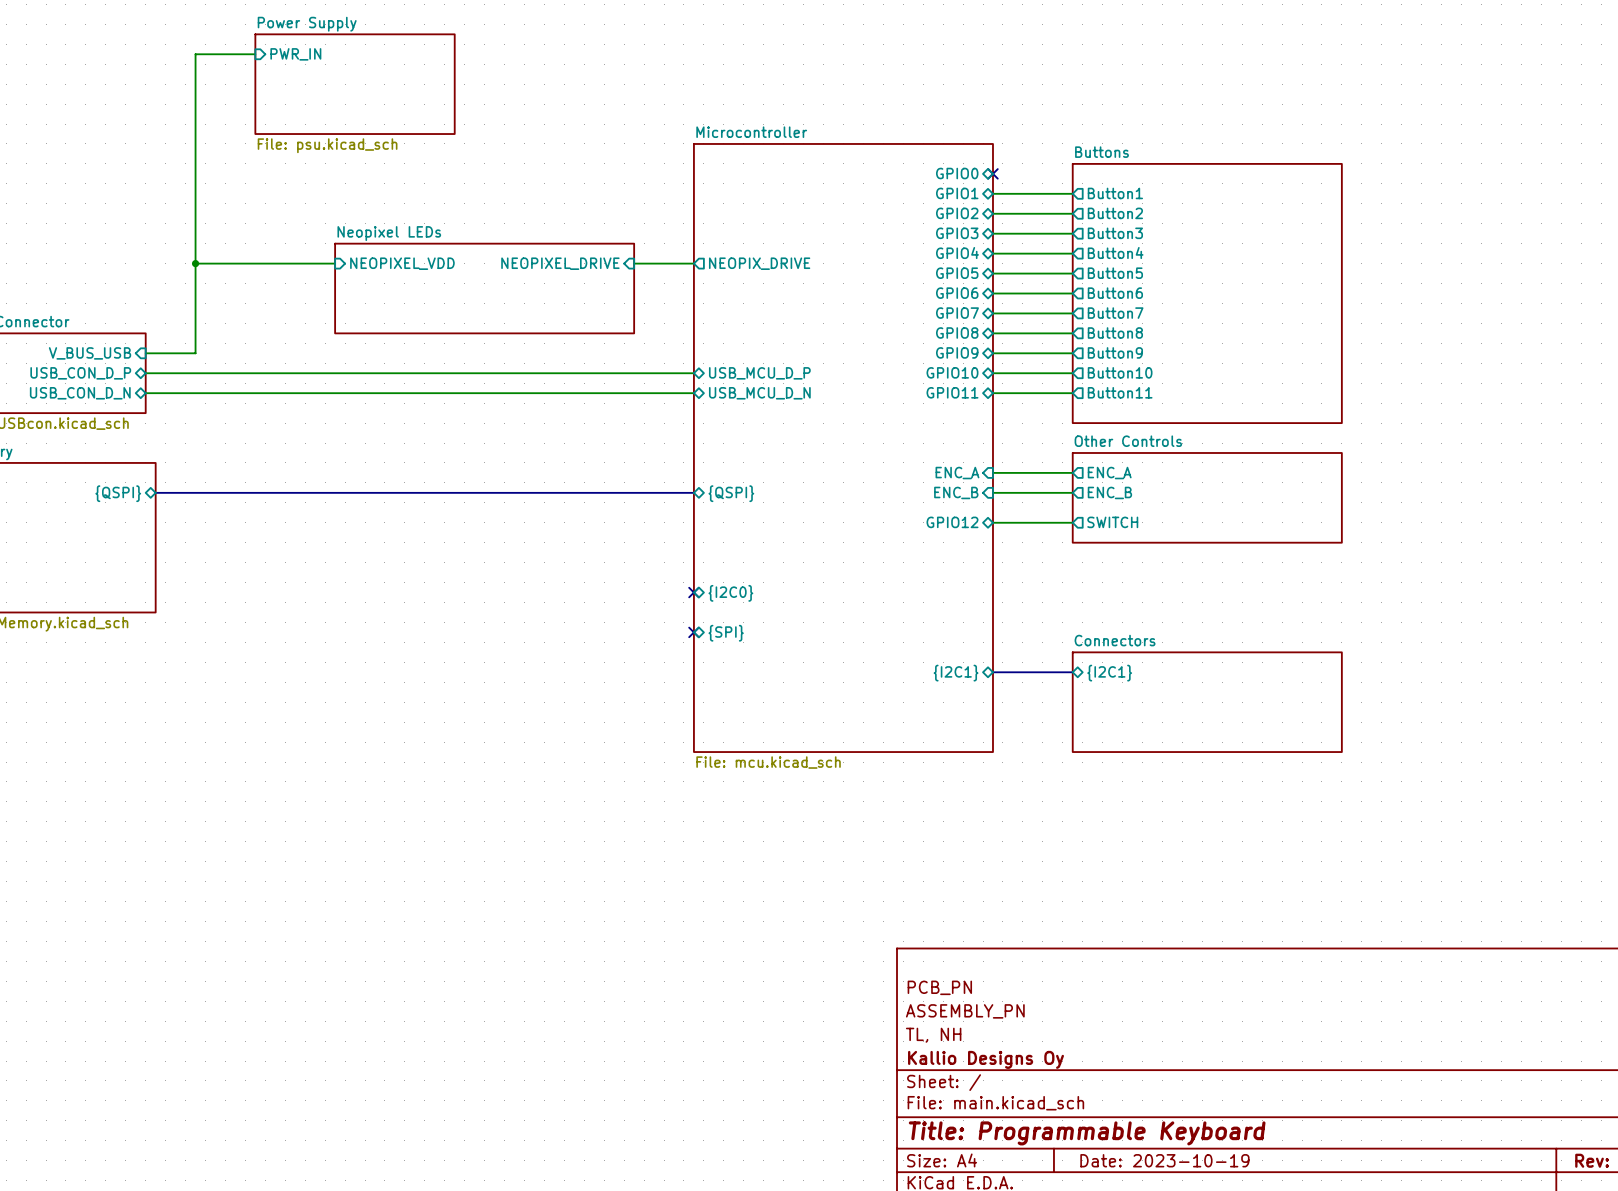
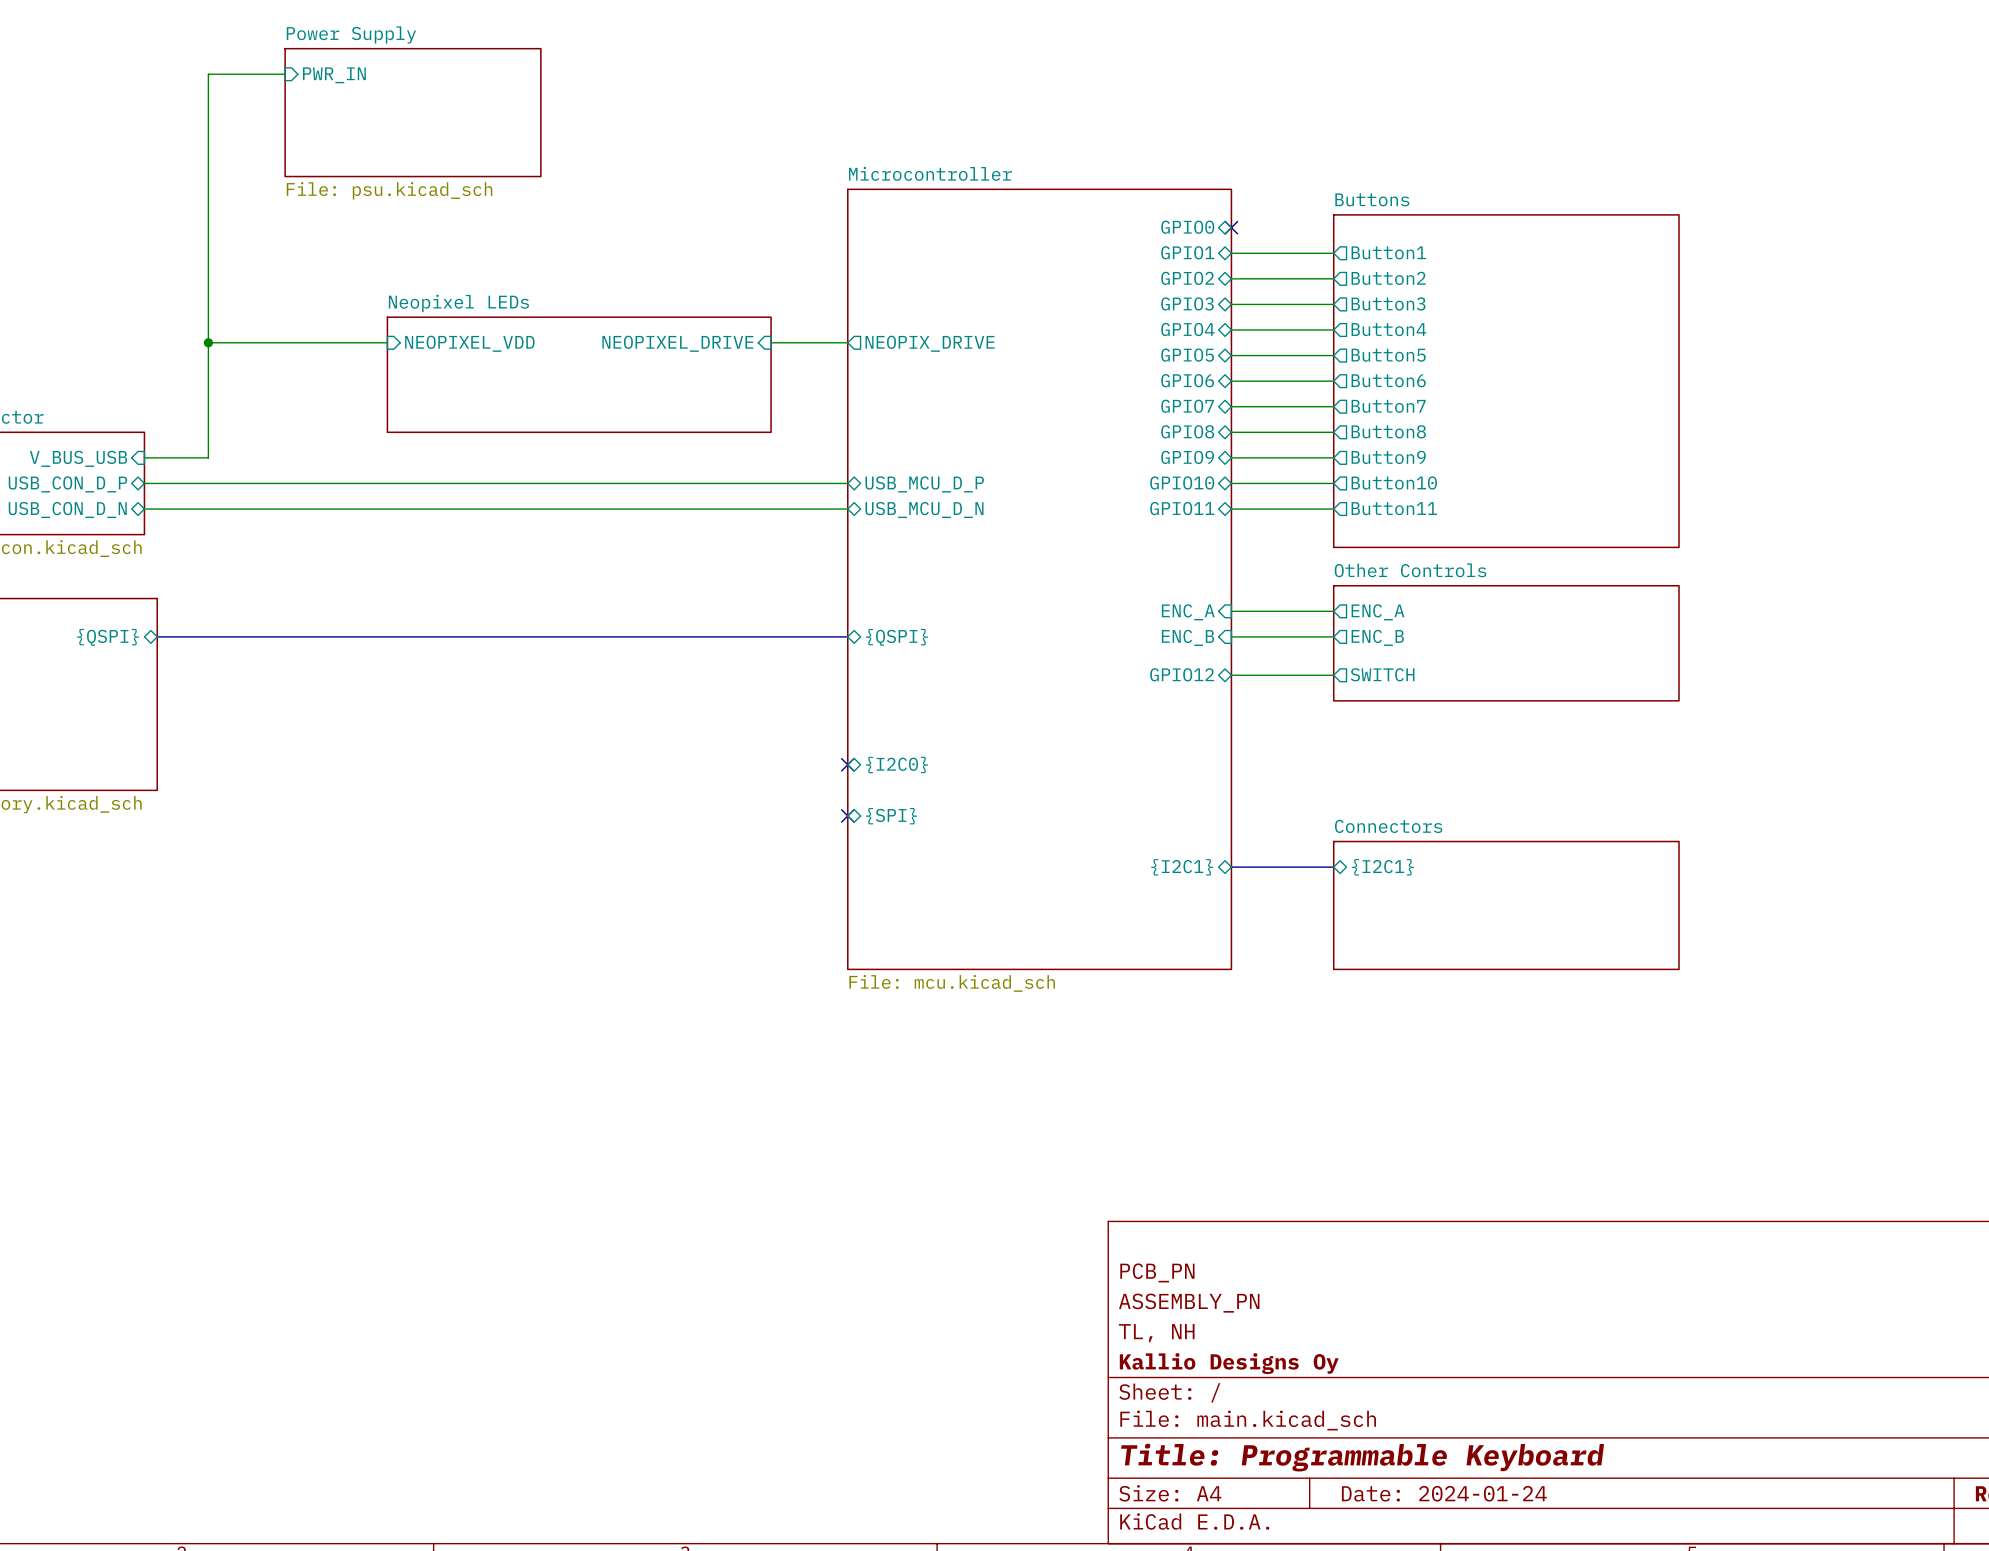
title block: Date: 2023-10-19 (1164, 1160) -> Date: 2024-01-24 (1444, 1493)

